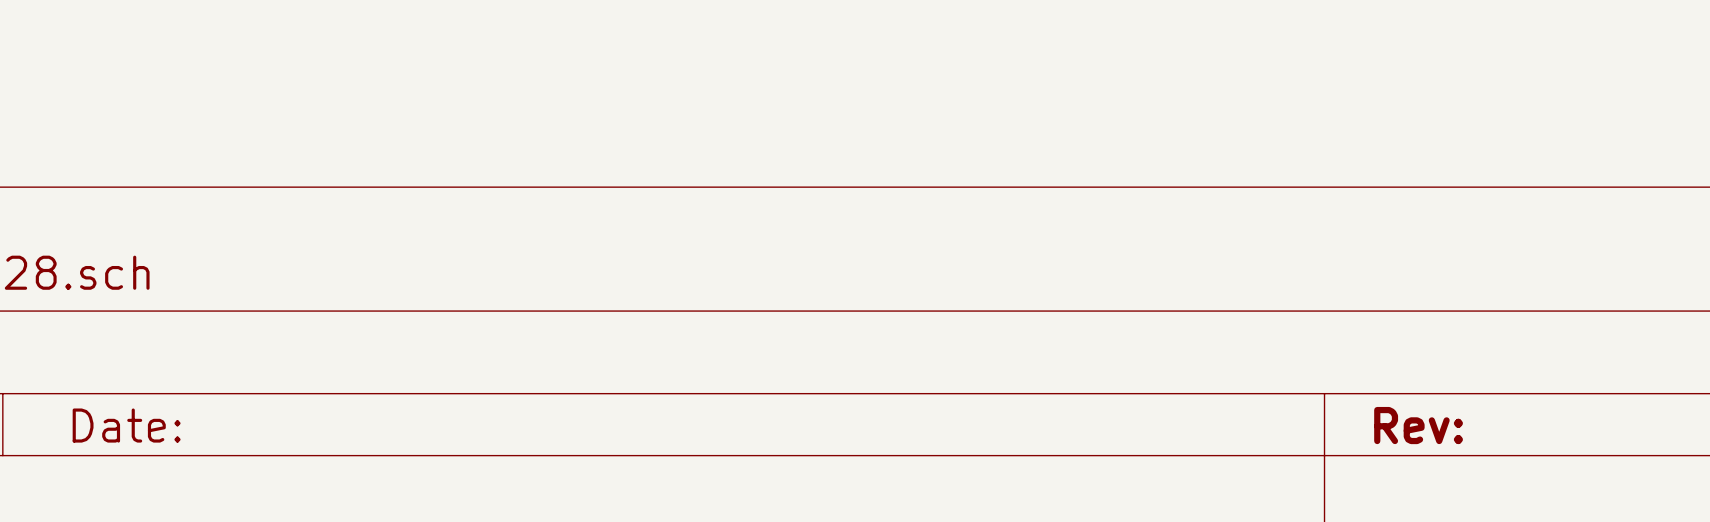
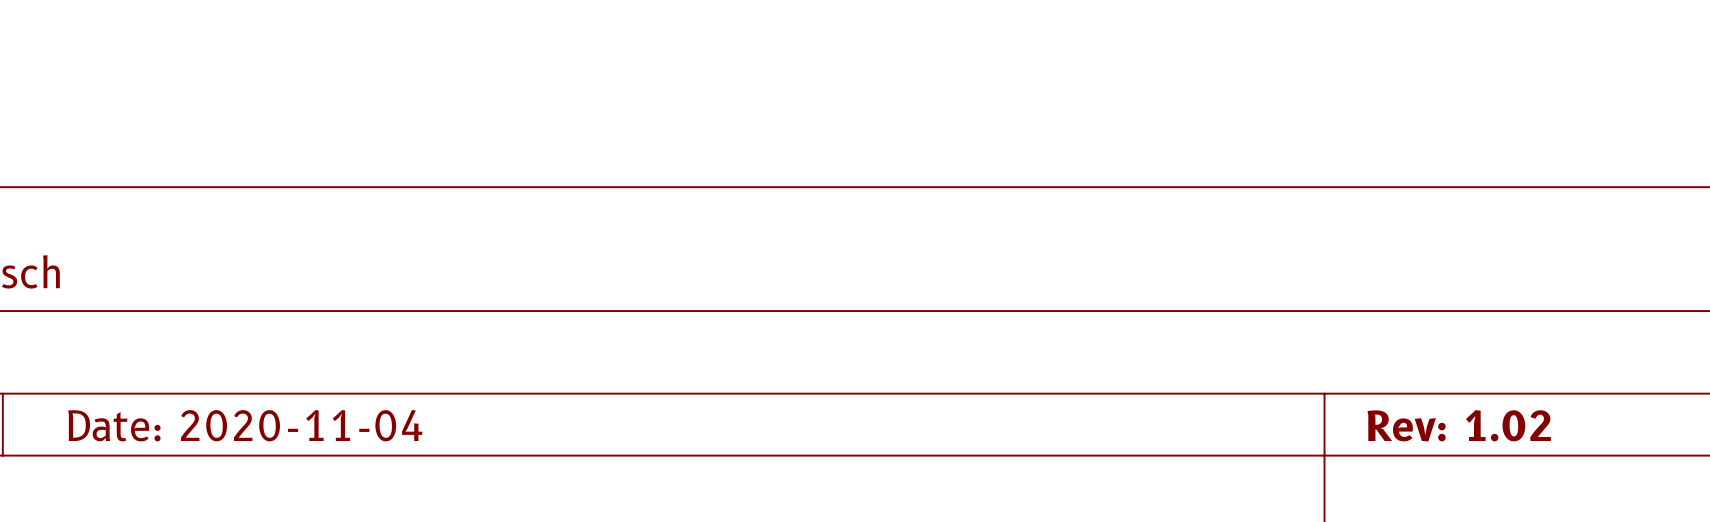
title block: Date: (126, 425) -> Date: 2020-11-04 (245, 425)
title block: Rev: (1418, 425) -> Rev: 1.02 (1459, 425)

